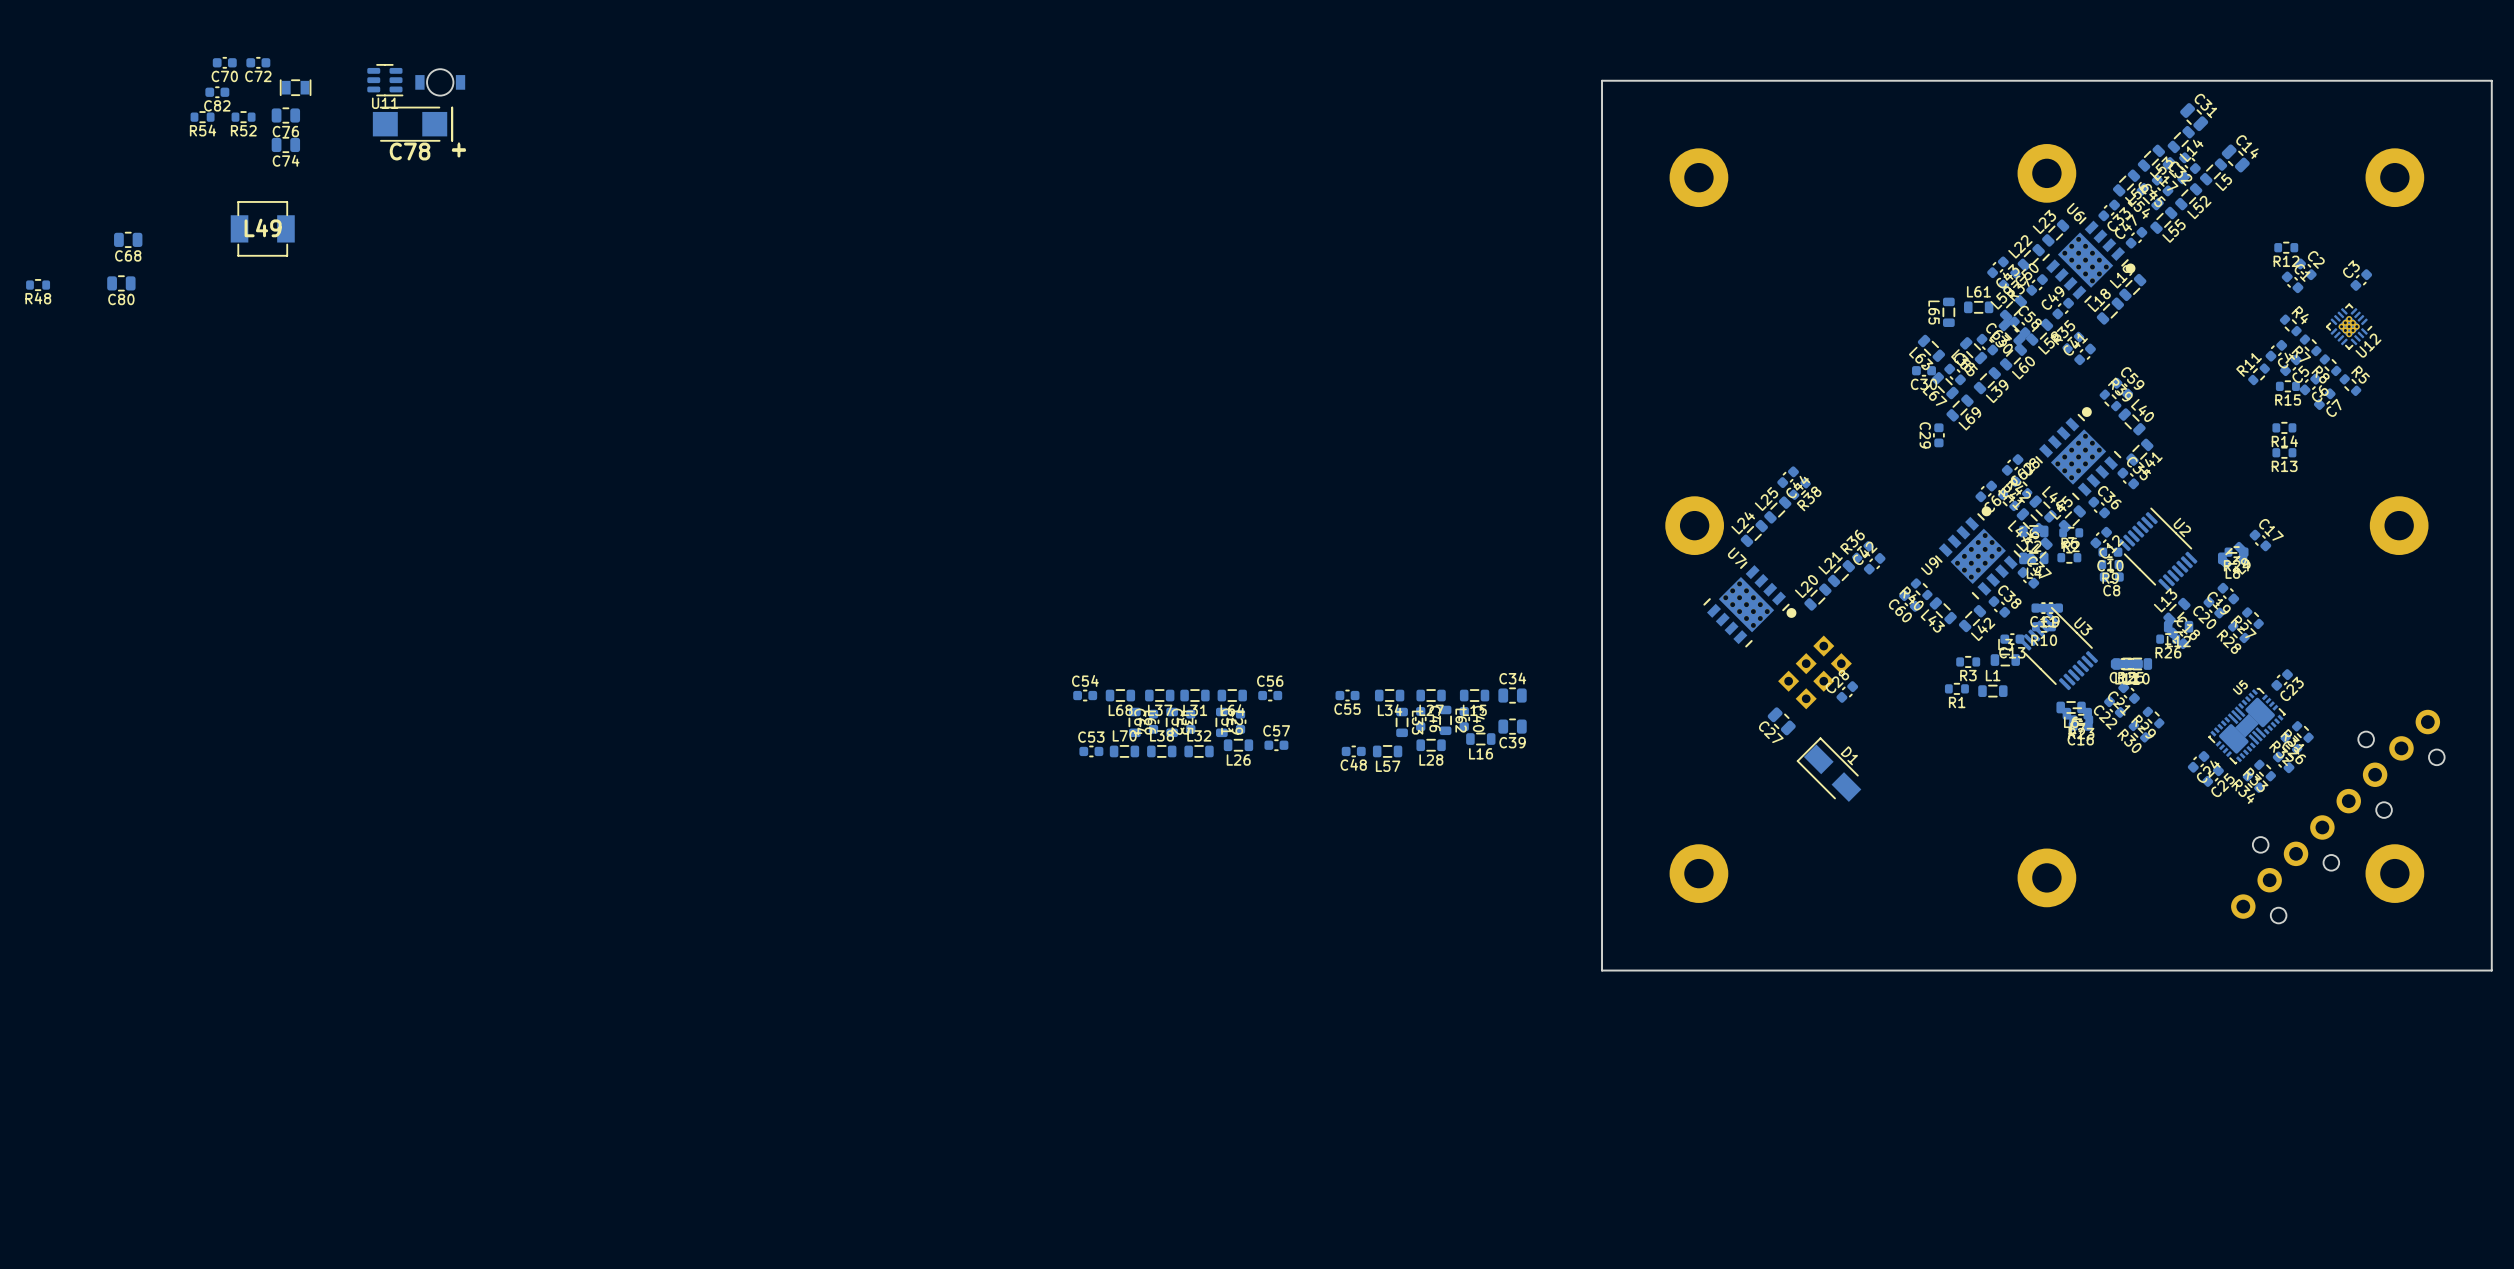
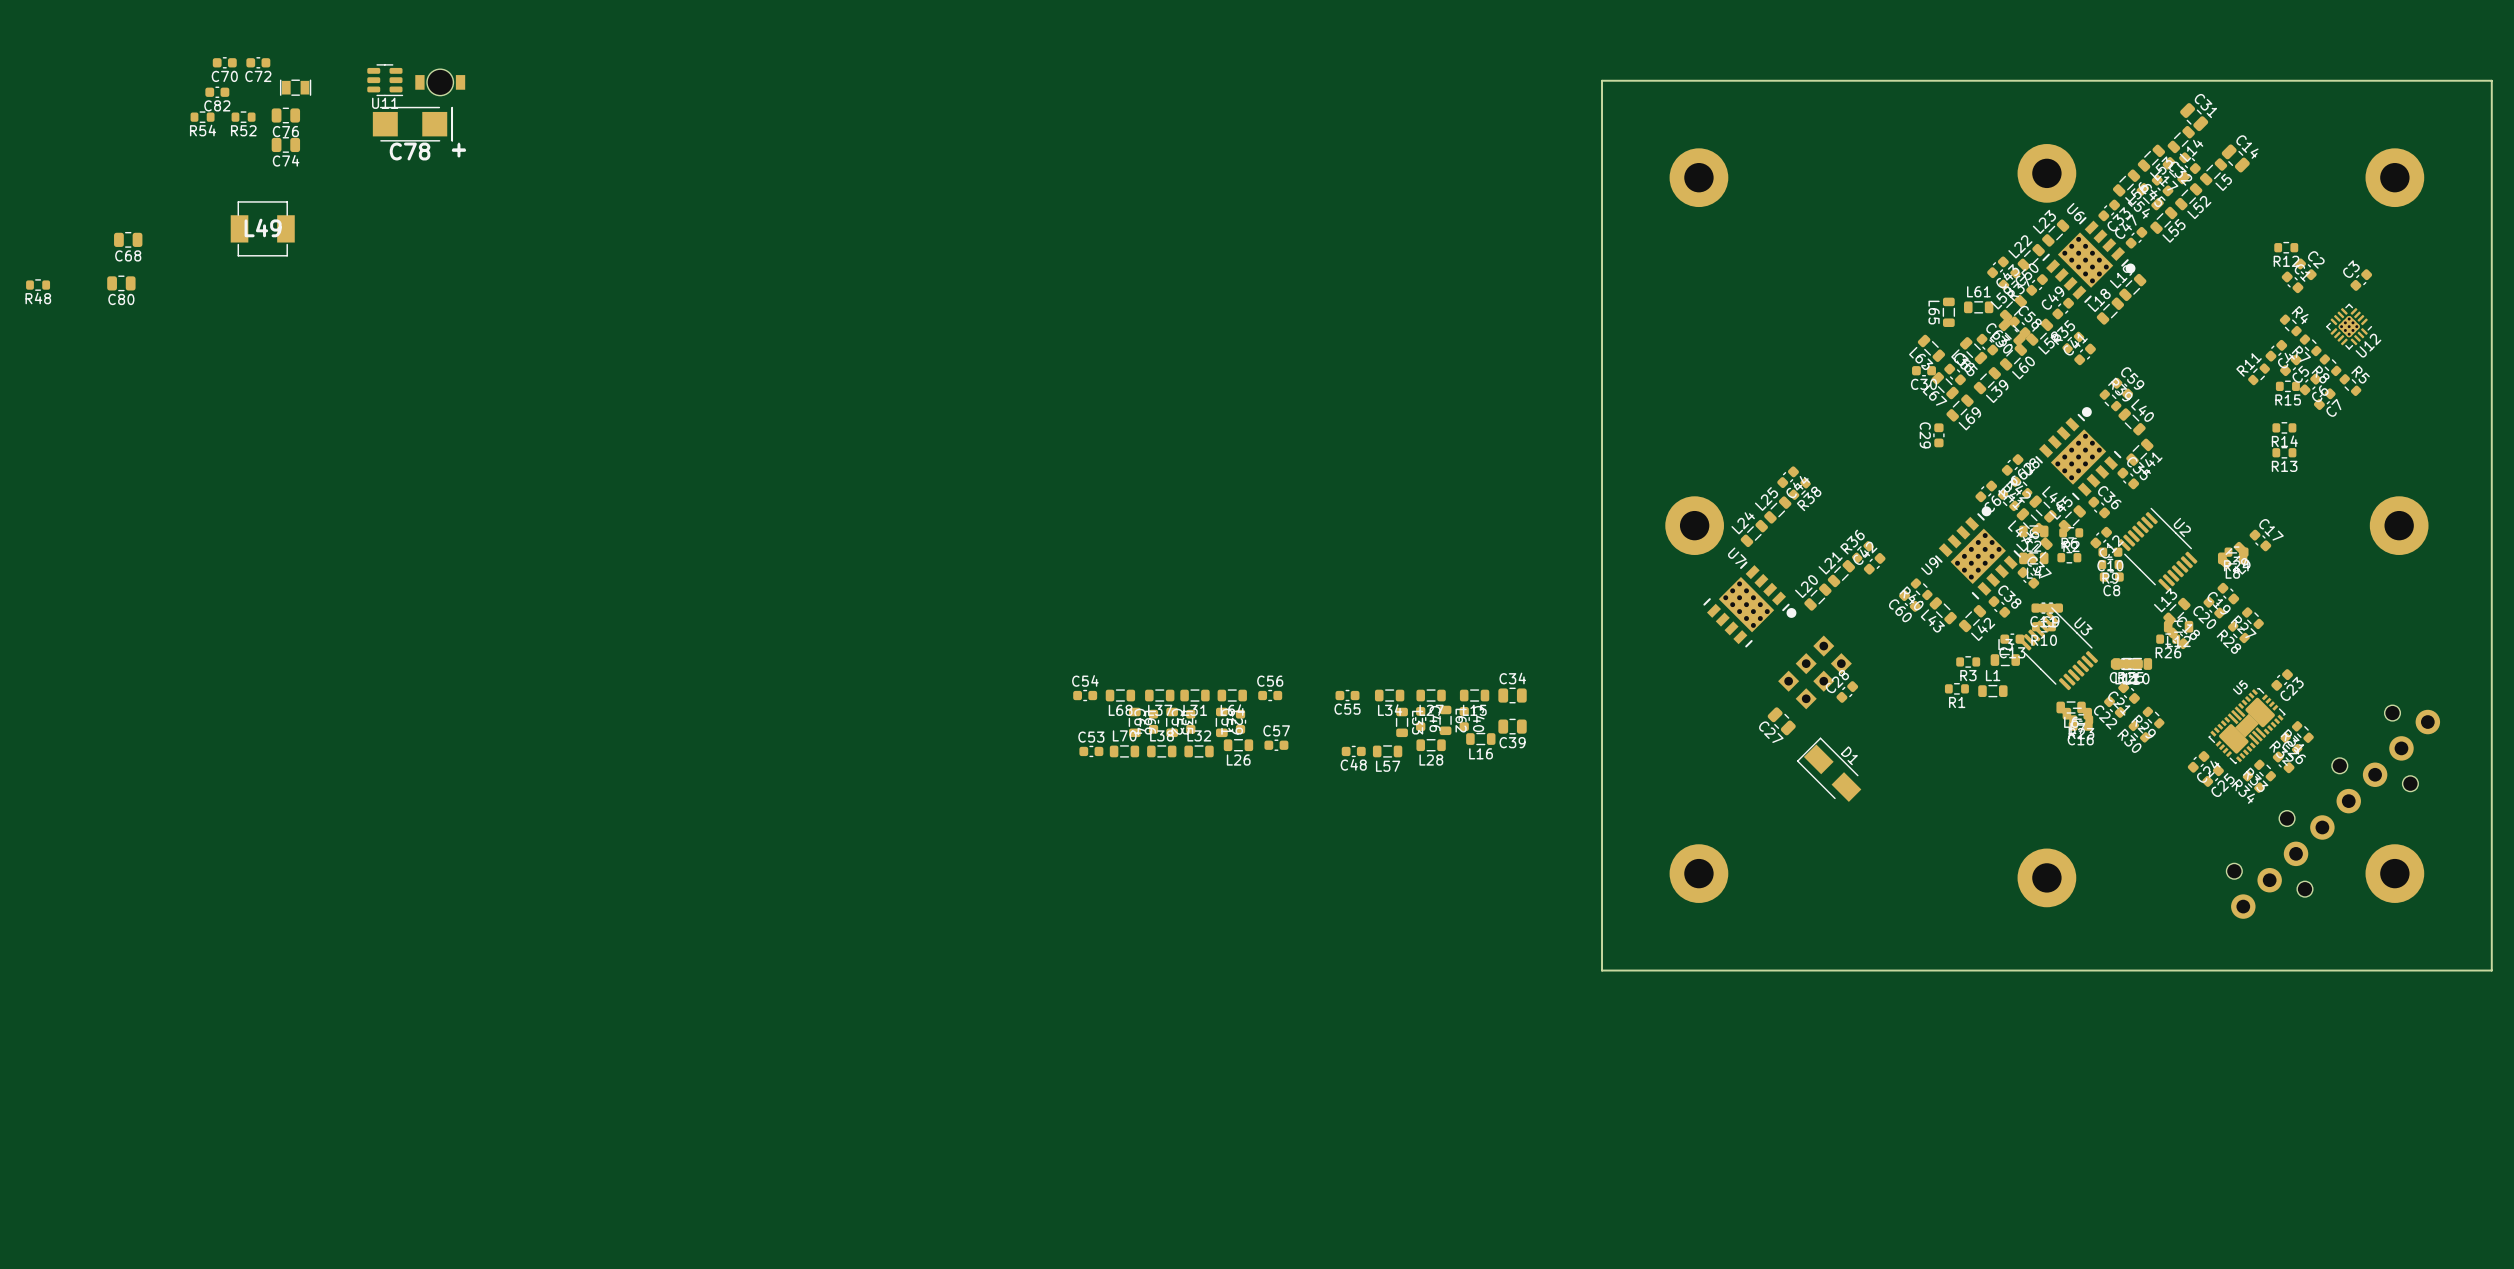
part rotation: 0° (2337, 816) -> 180° (2333, 812)

